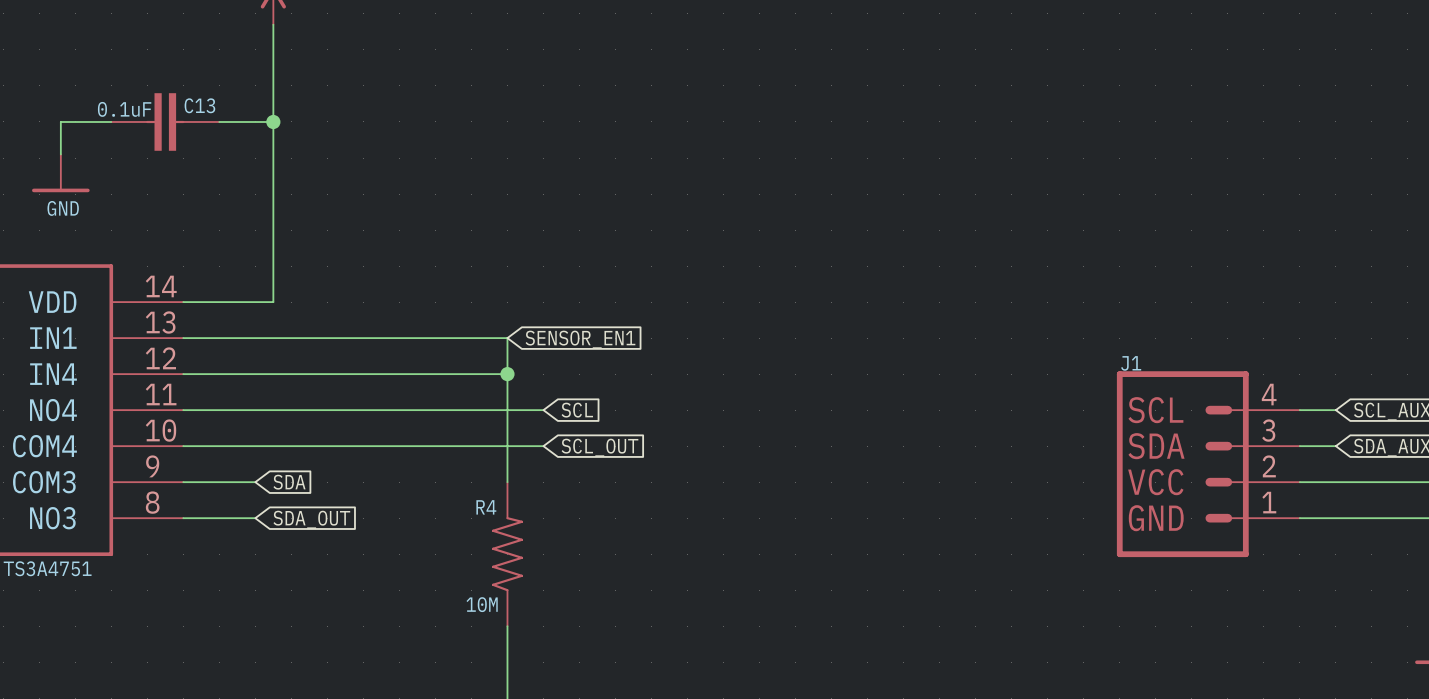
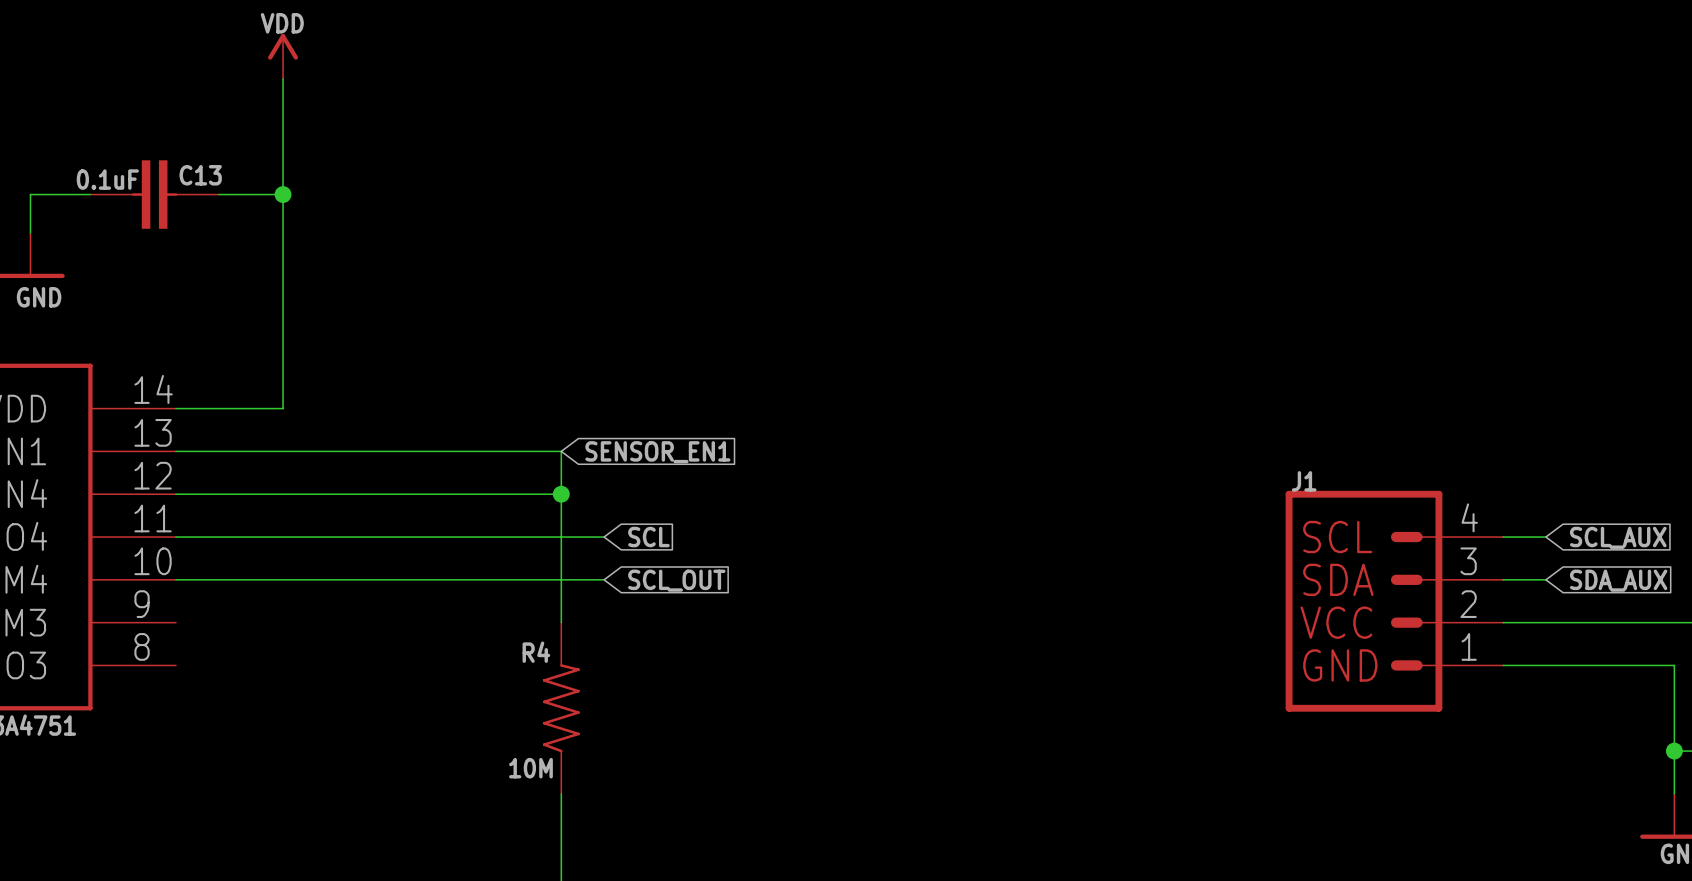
wire: (183, 482) (255, 482) -> none
global label: SDA (289, 482) -> none
wire: (183, 518) (255, 518) -> none
global label: SDA_OUT (311, 519) -> none

